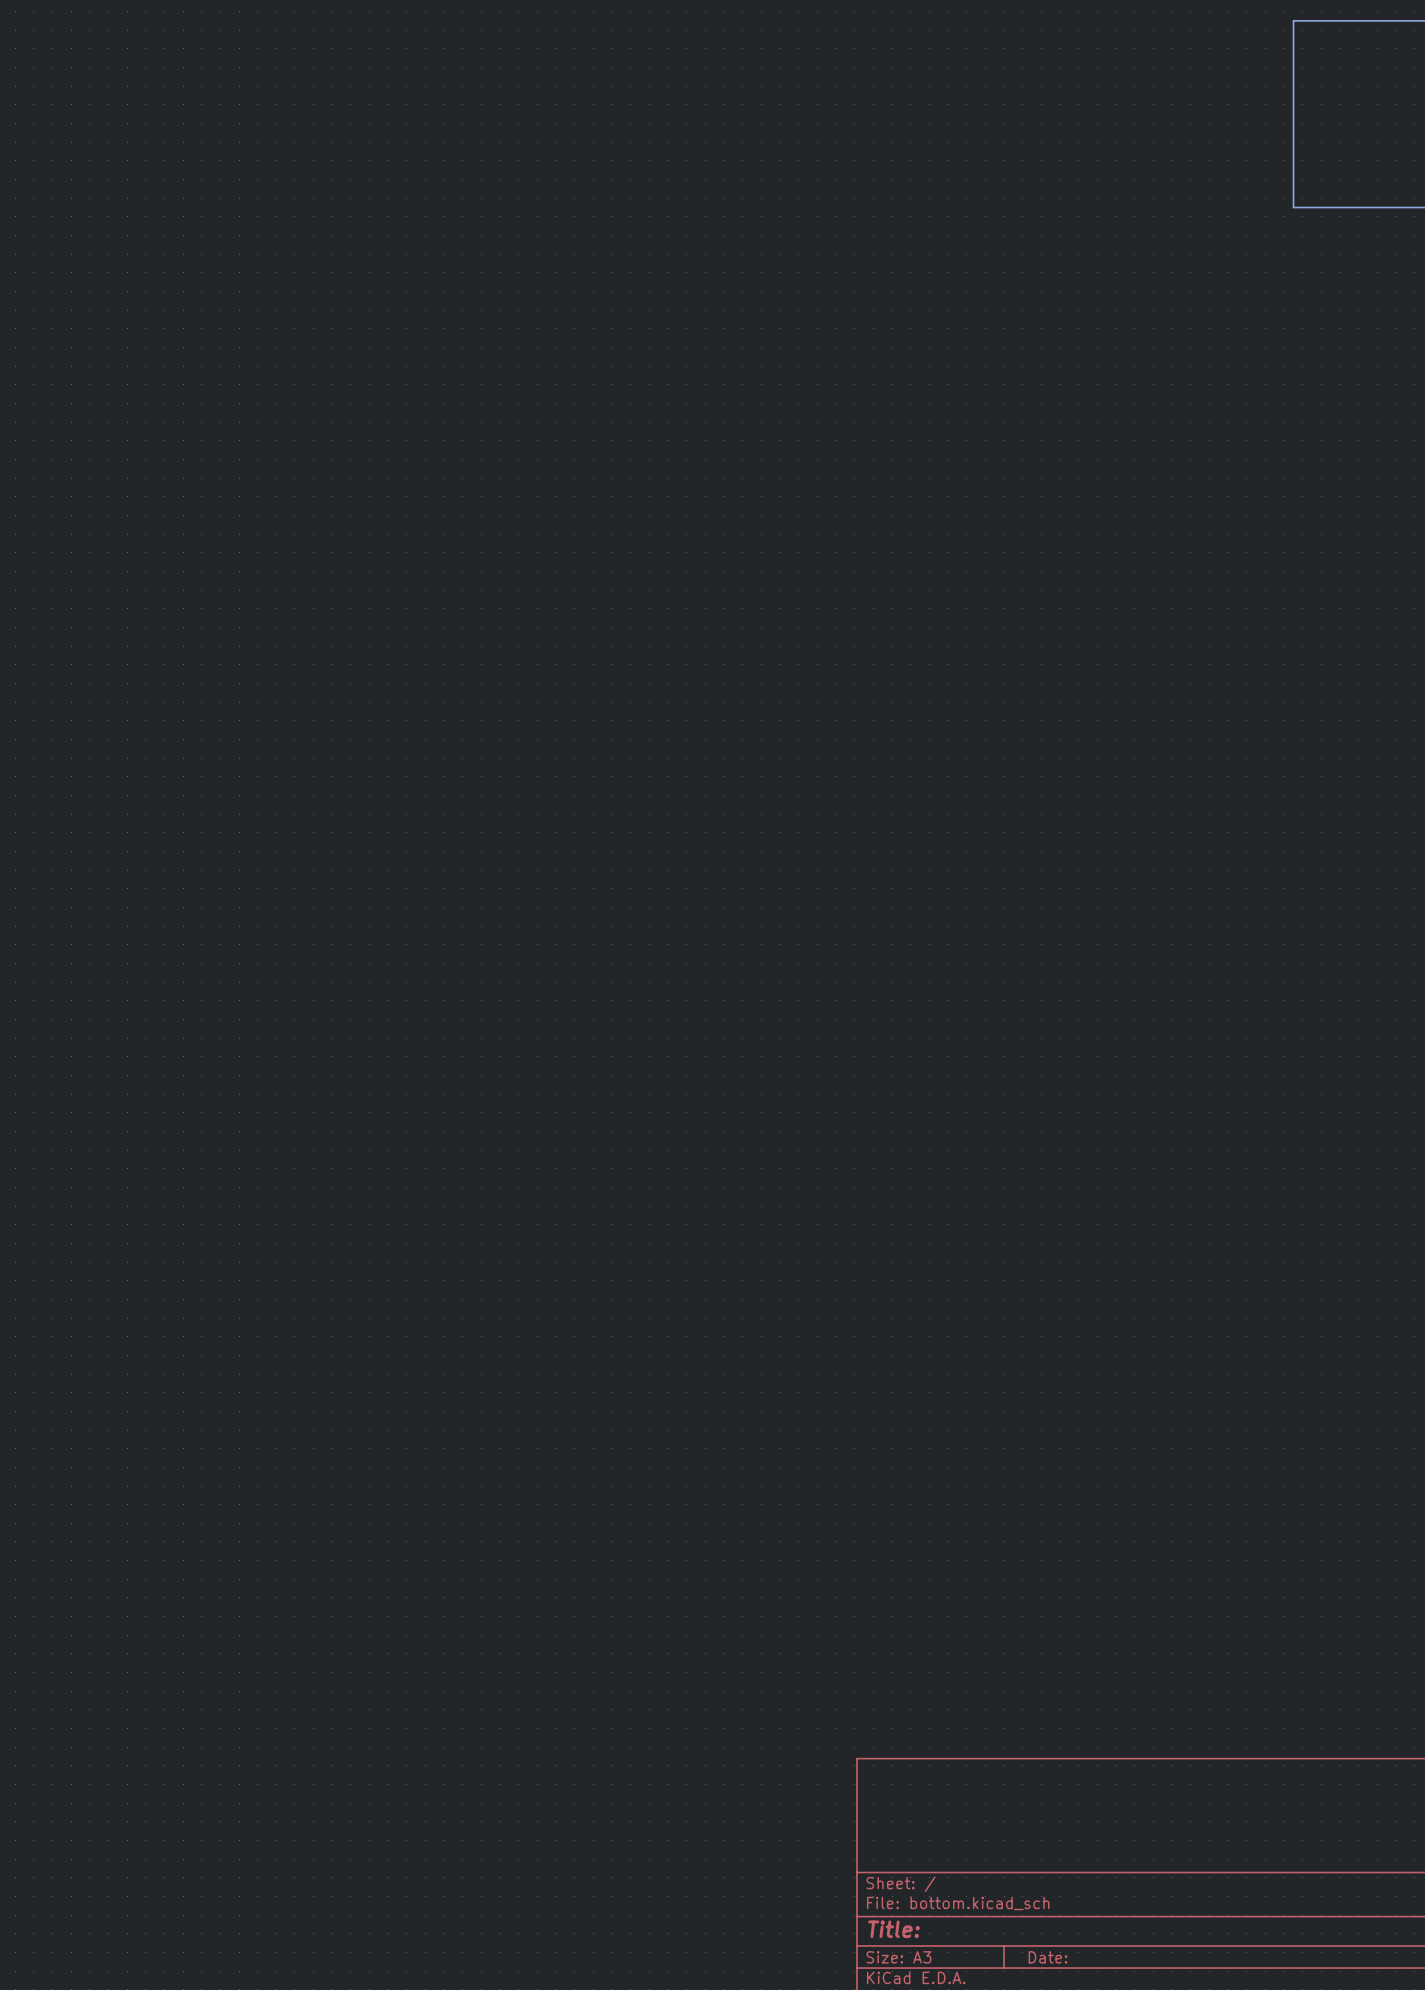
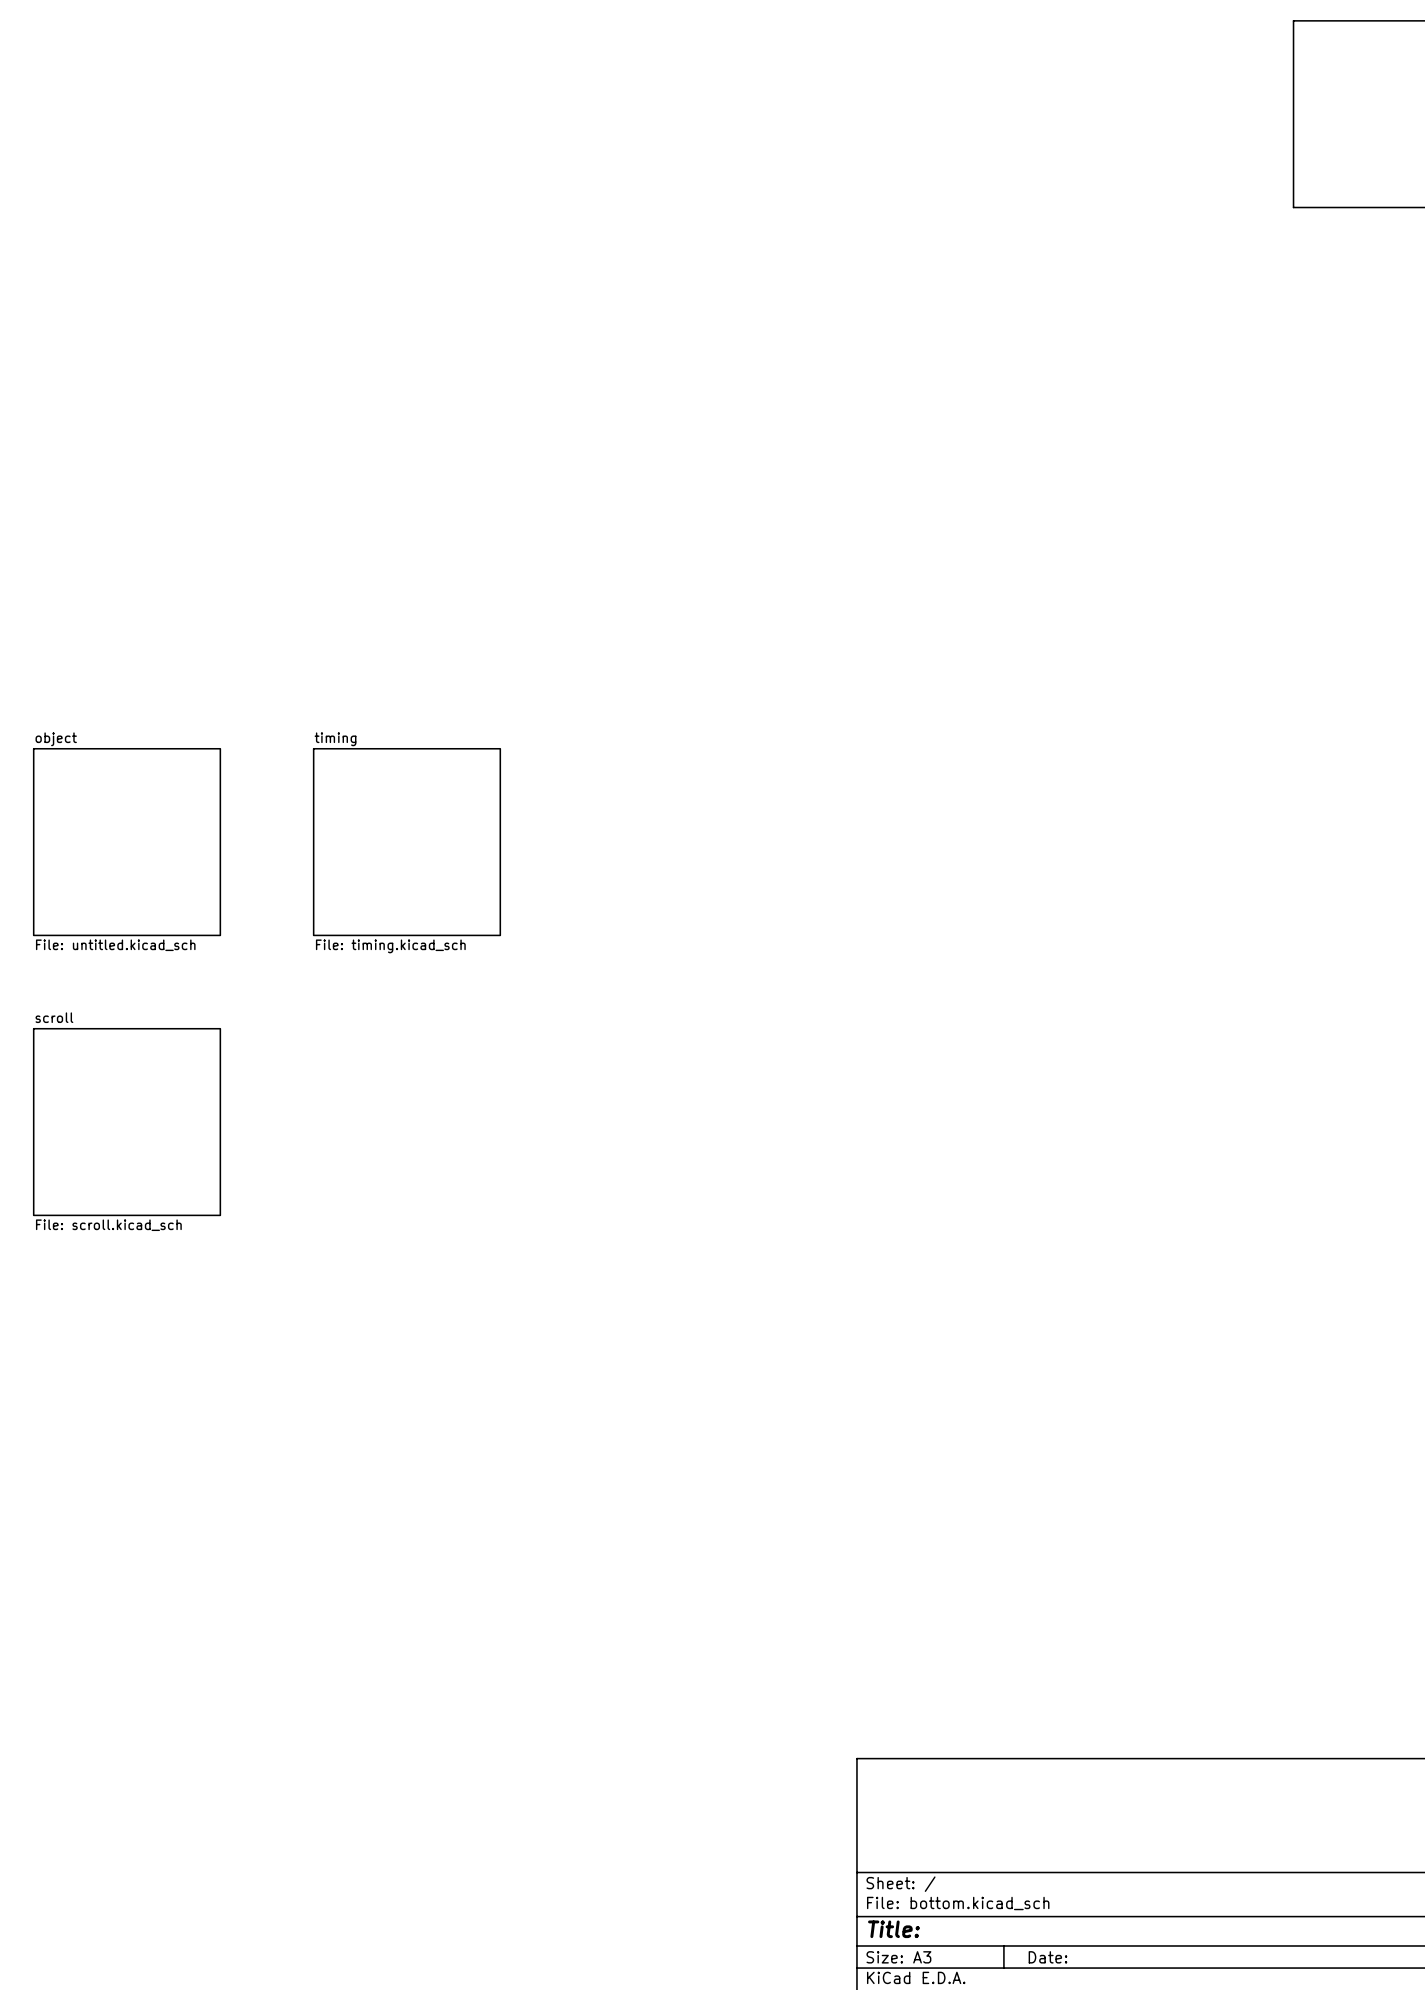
sheet object: none -> File: untitled.kicad_sch (127, 842)
sheet timing: none -> File: timing.kicad_sch (406, 842)
sheet scroll: none -> File: scroll.kicad_sch (127, 1122)

